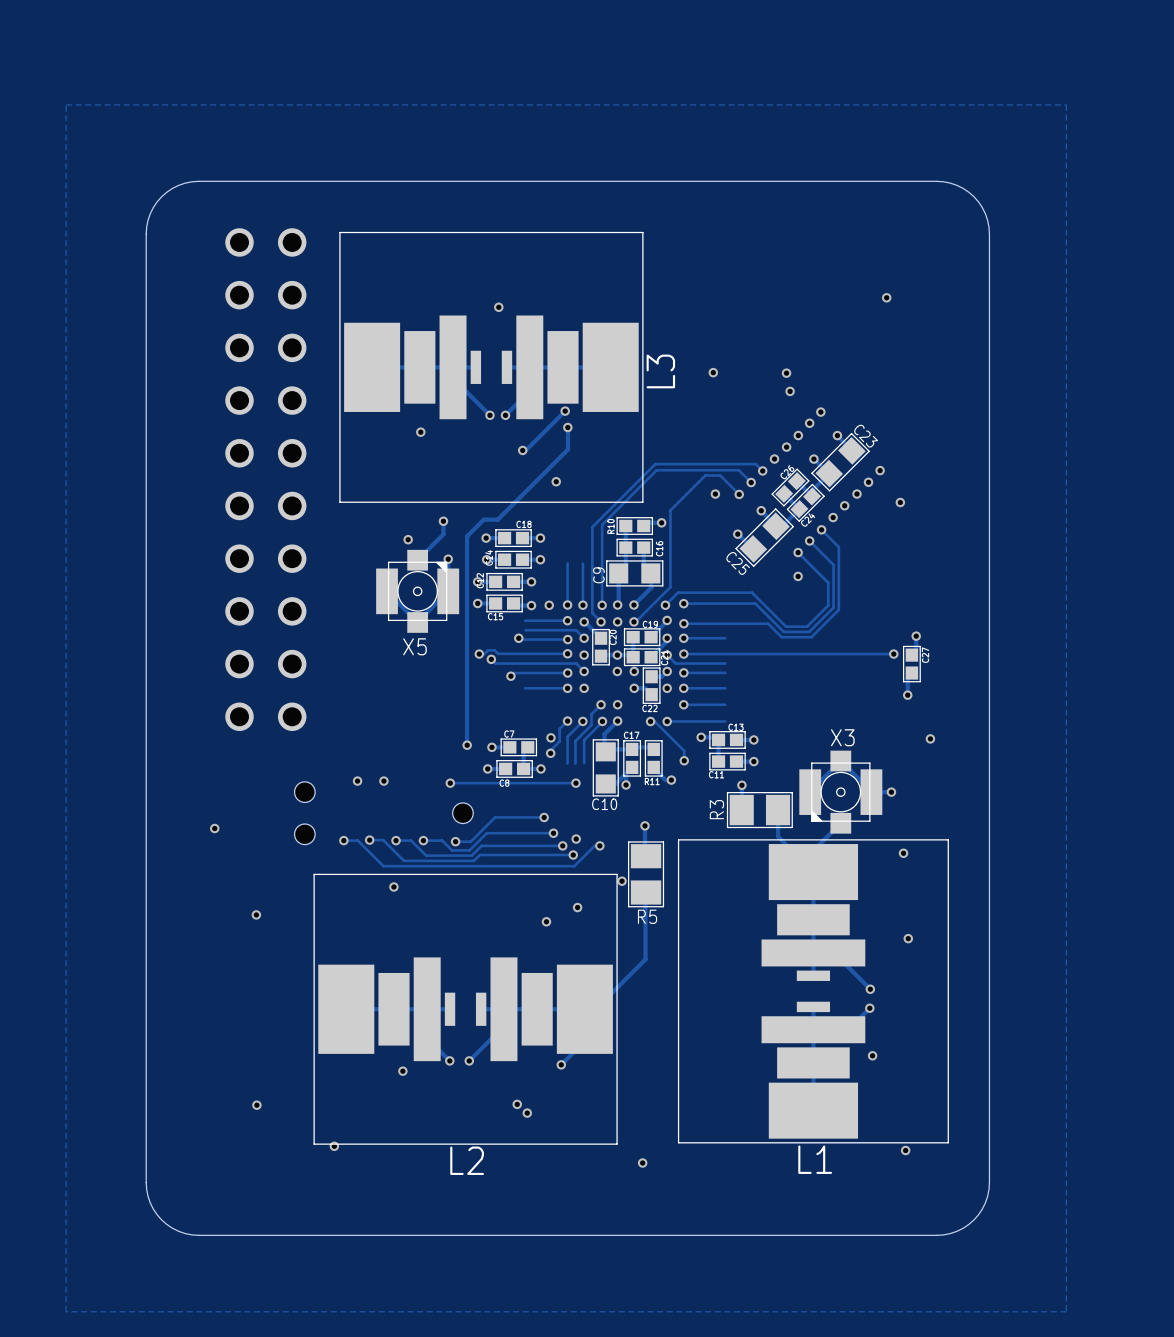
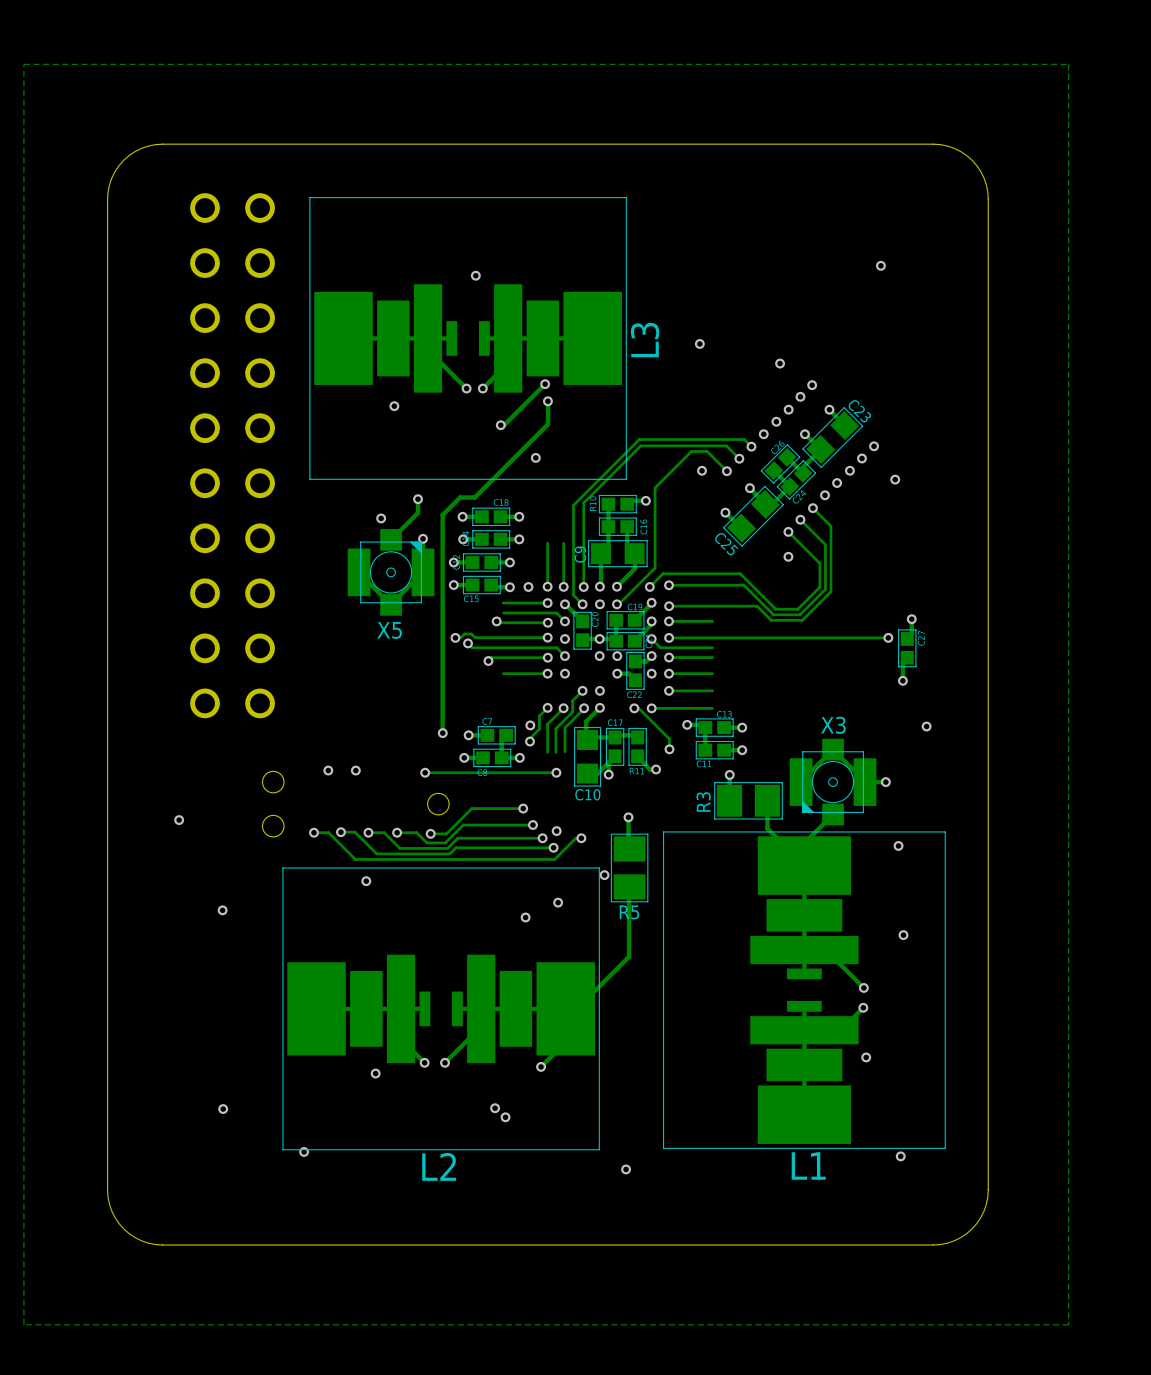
via: (786, 373) -> none

